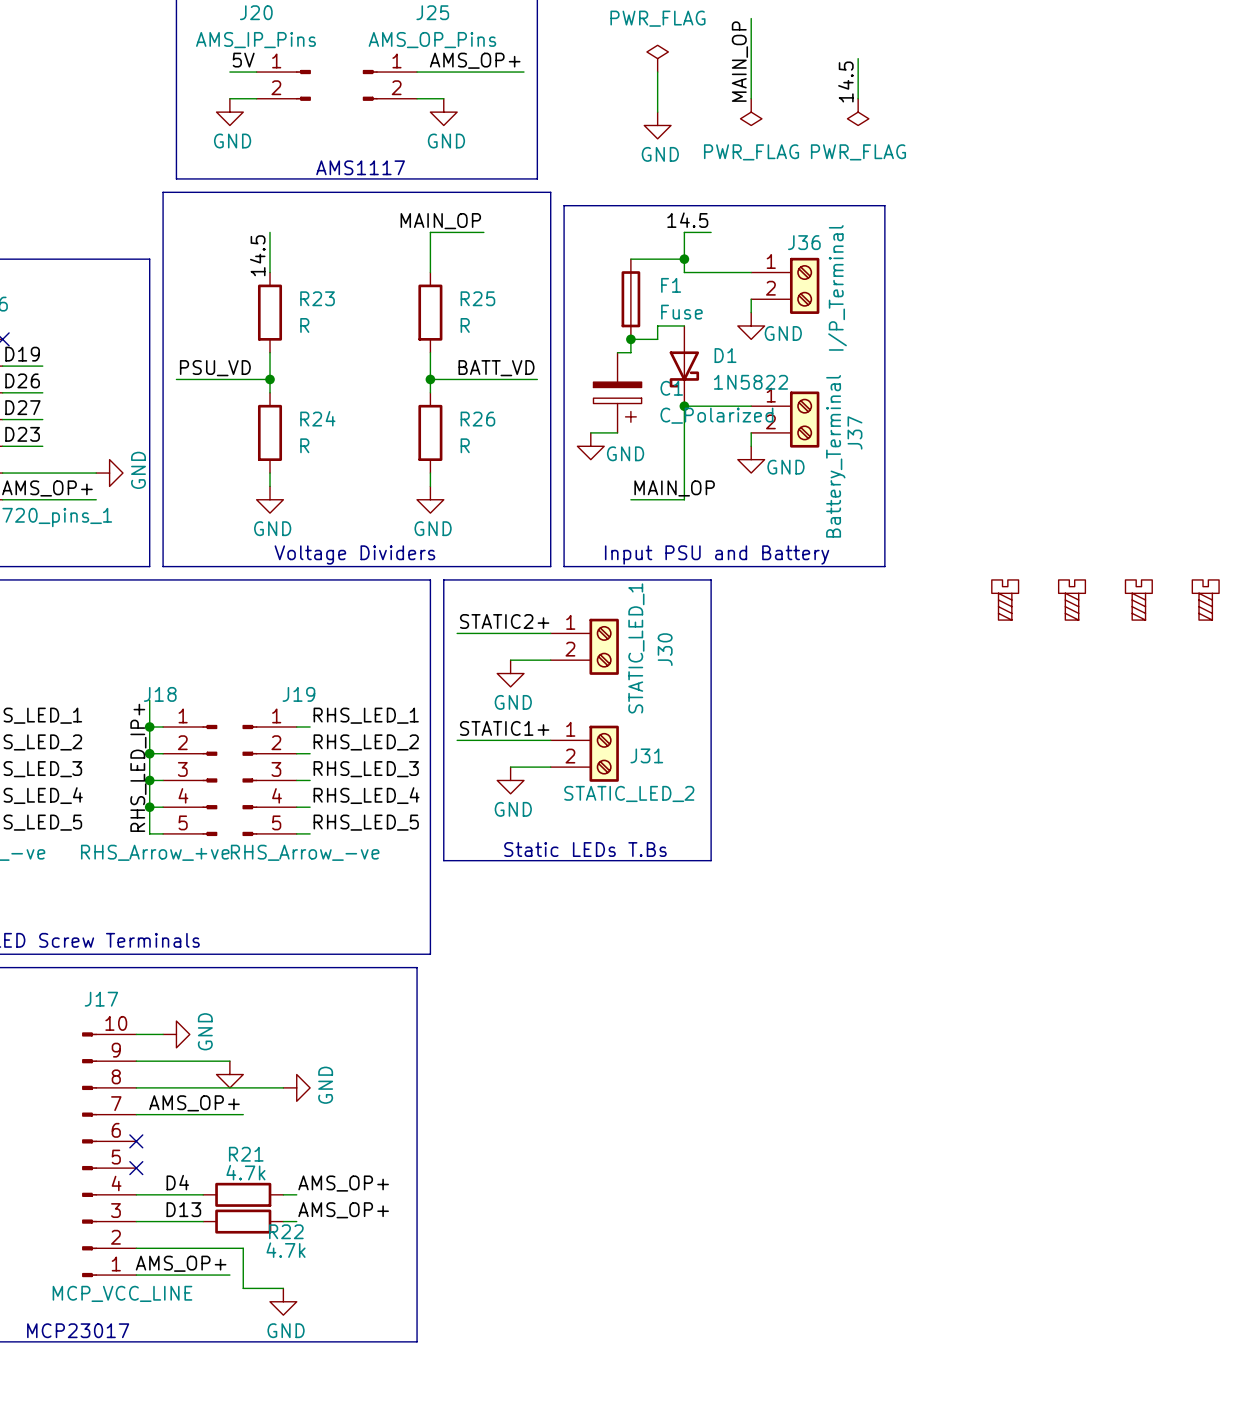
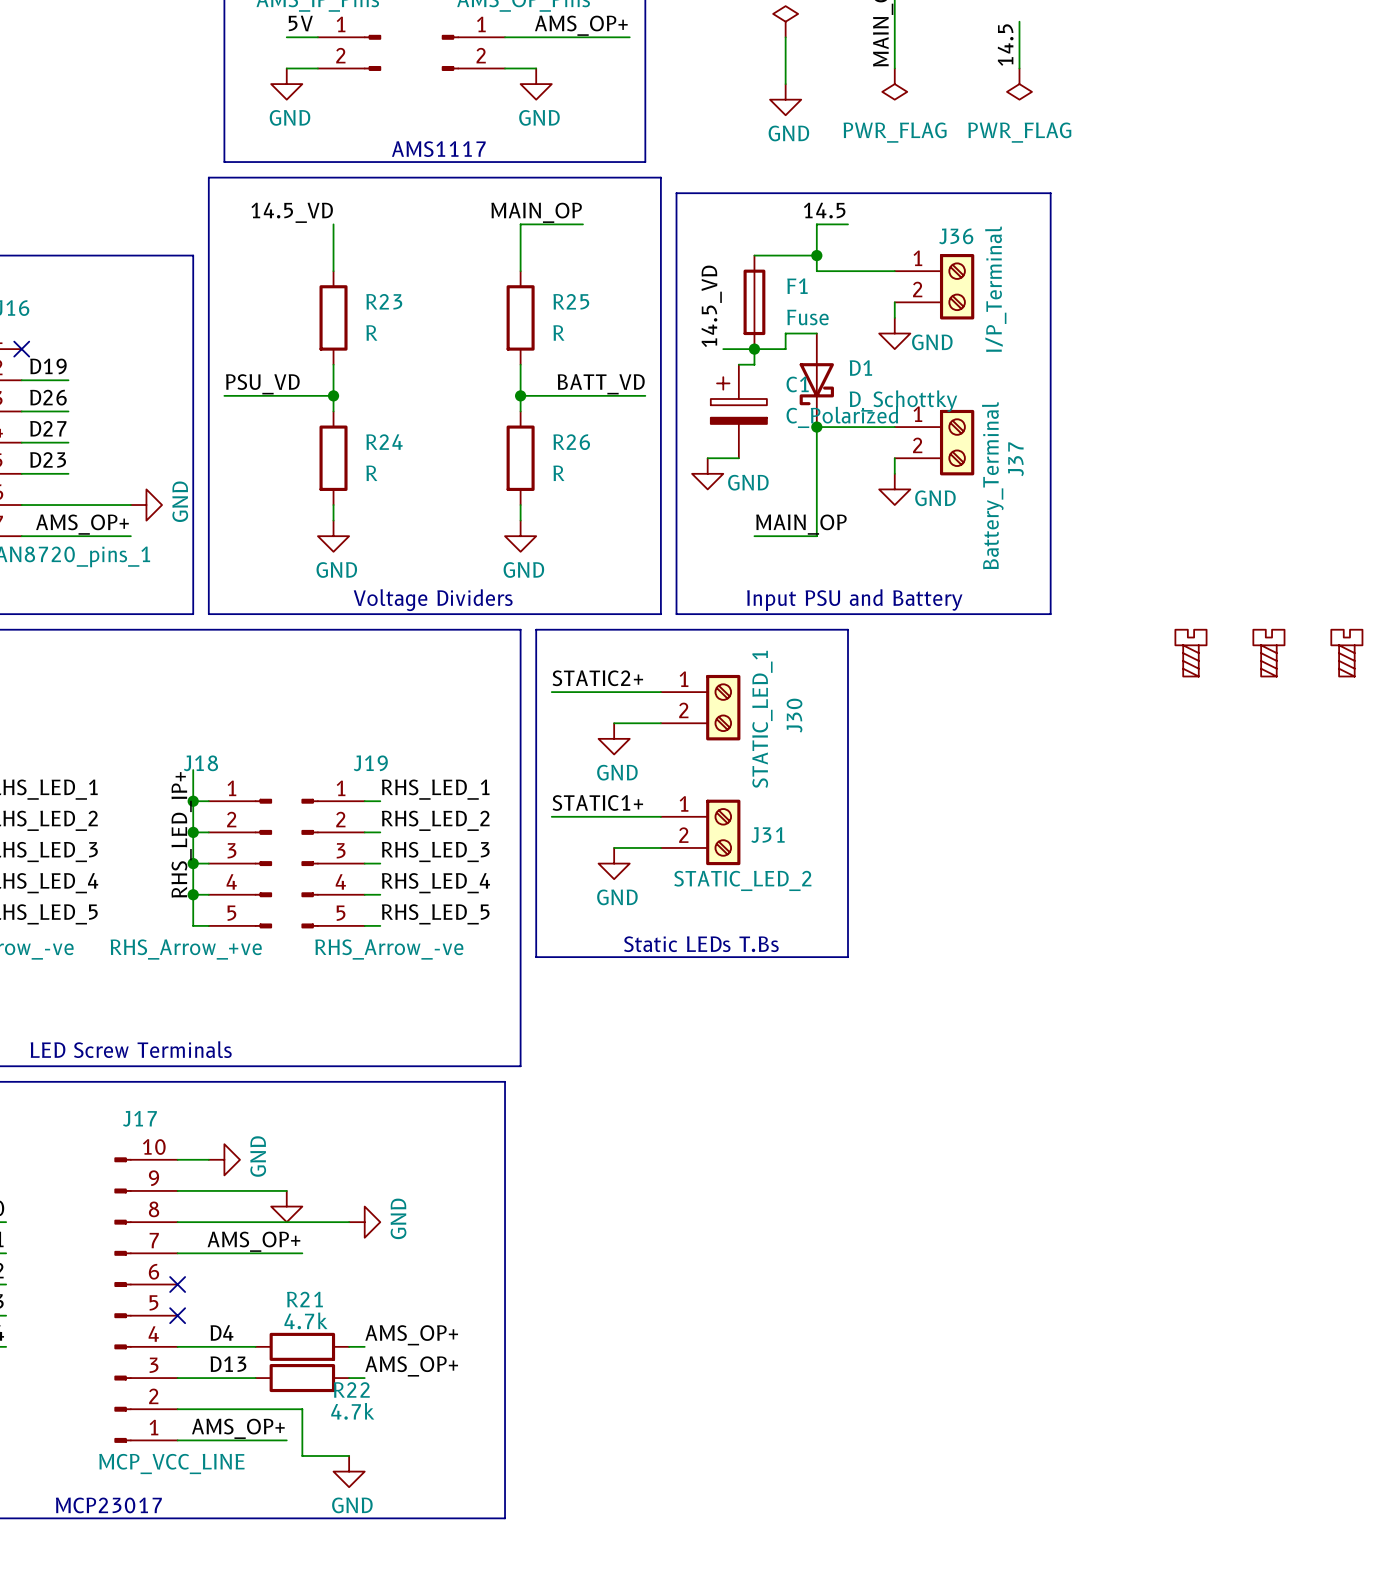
label: 14.5 (257, 255) -> 14.5_VD (292, 212)
label: none -> 14.5_VD (711, 306)
wire: none -> (723, 349) (754, 349)
D1 value: 1N5822 (750, 382) -> D_Schottky (903, 401)
C1 rotation: 0° (617, 402) -> 180° (738, 400)

